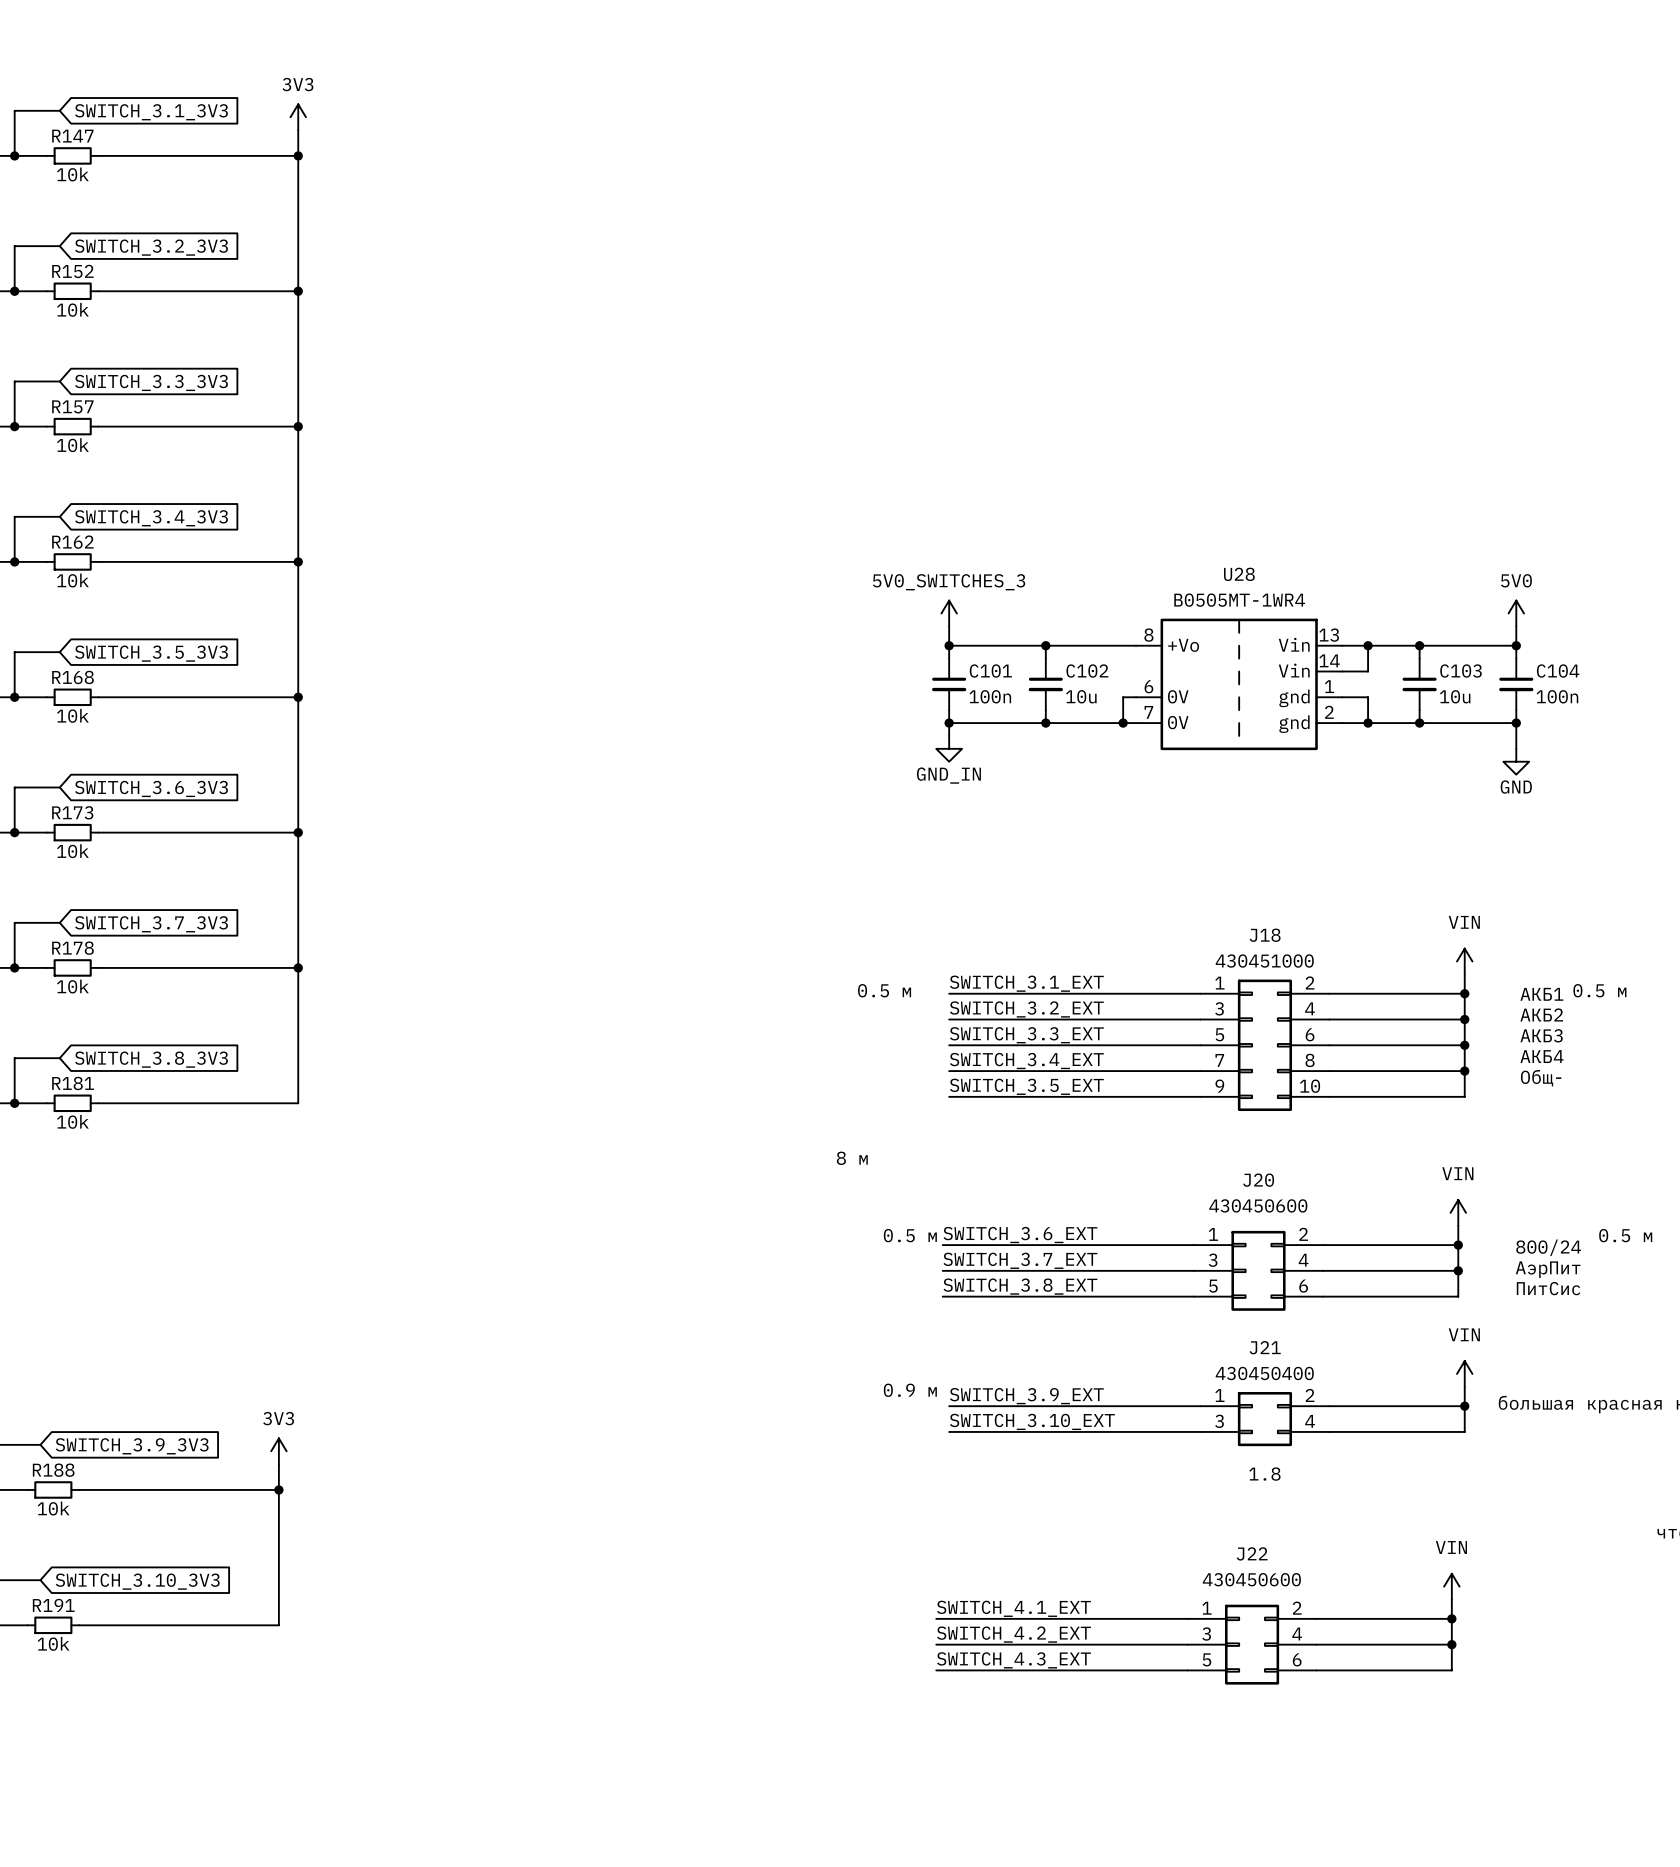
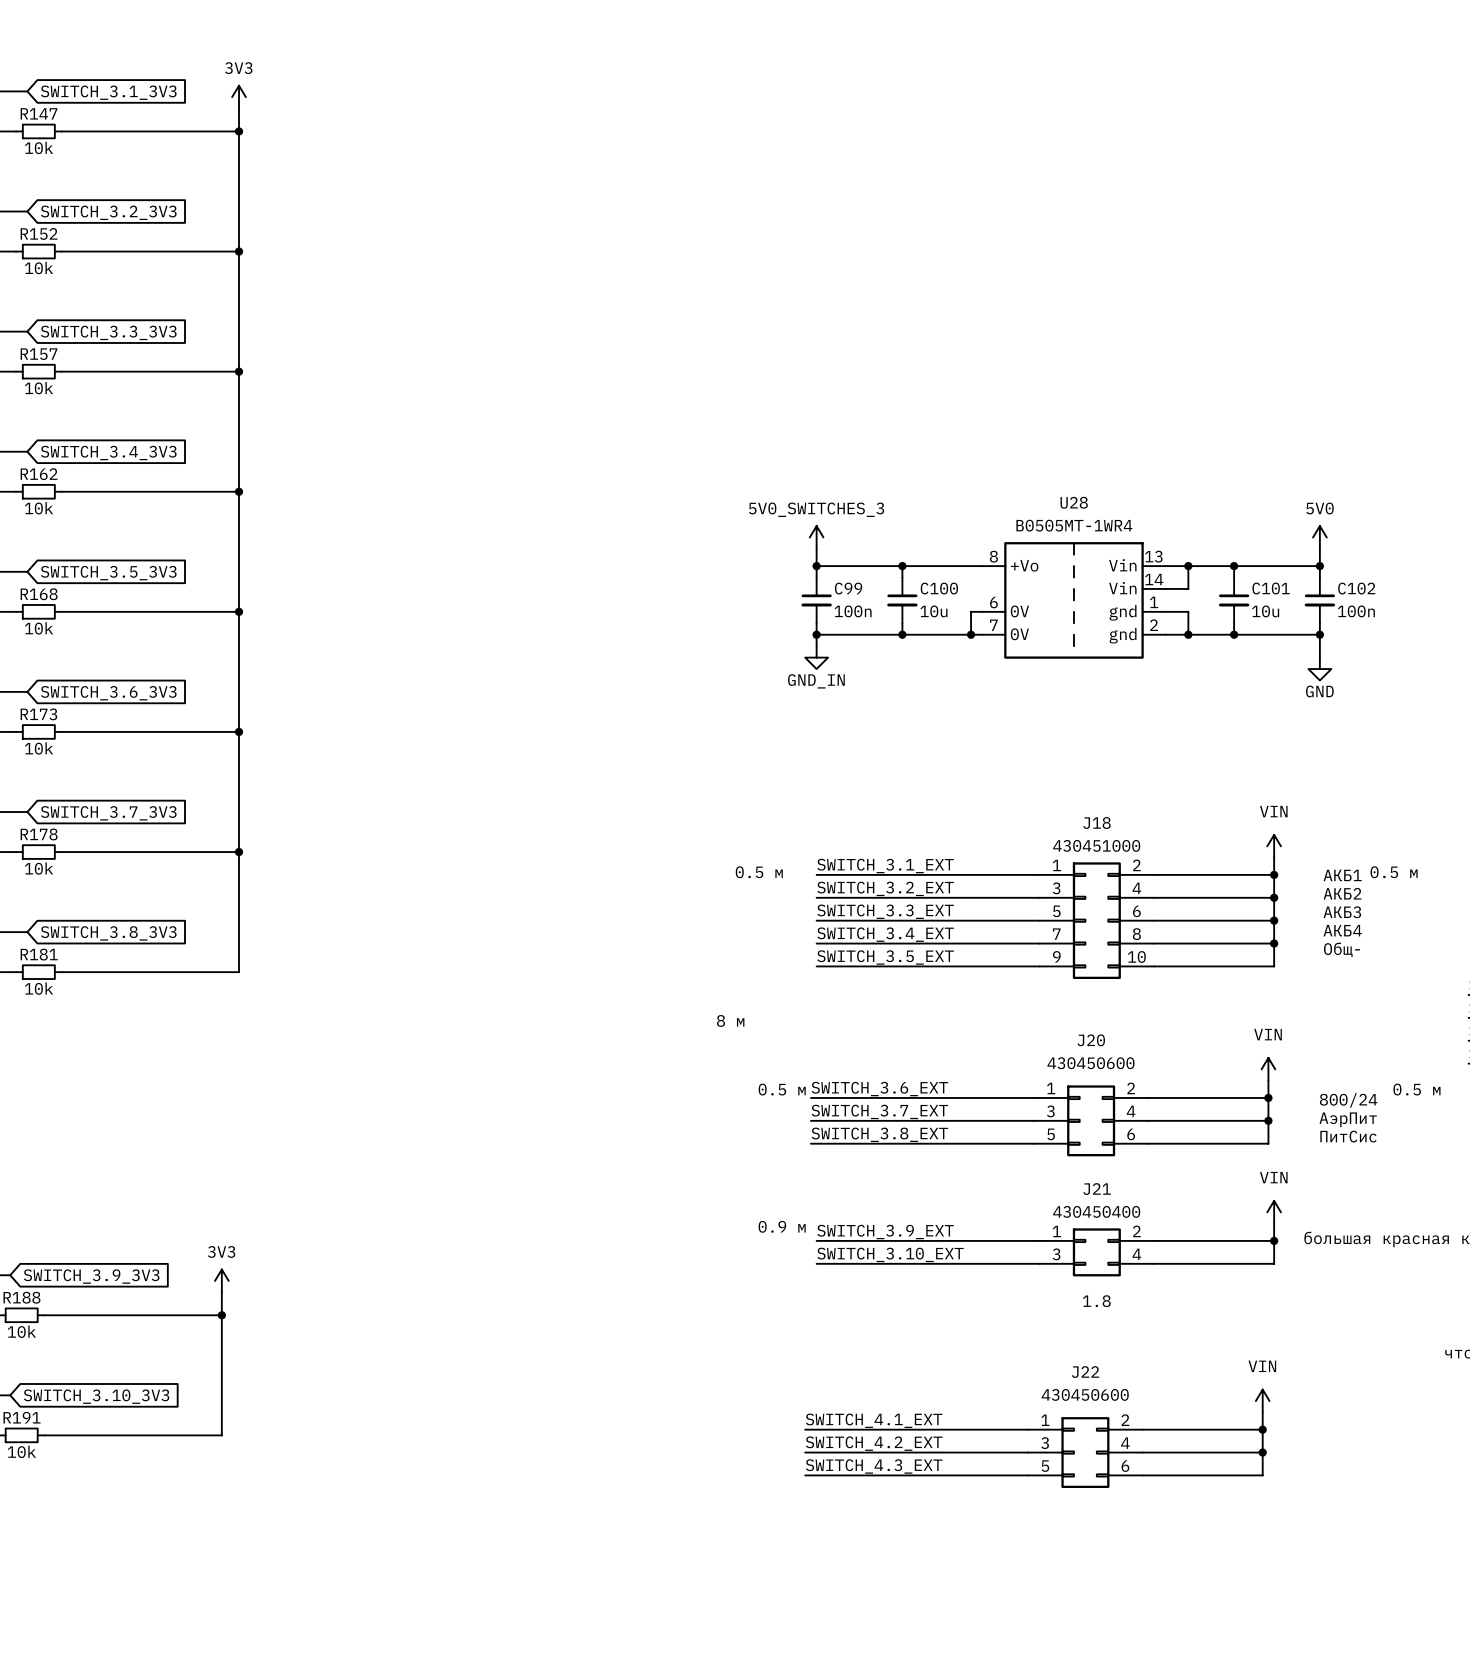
C101 name: C101 (990, 671) -> C99 (848, 588)
C102 name: C102 (1087, 671) -> C100 (939, 588)
C103 name: C103 (1461, 671) -> C101 (1271, 588)
C104 name: C104 (1558, 671) -> C102 (1356, 588)

